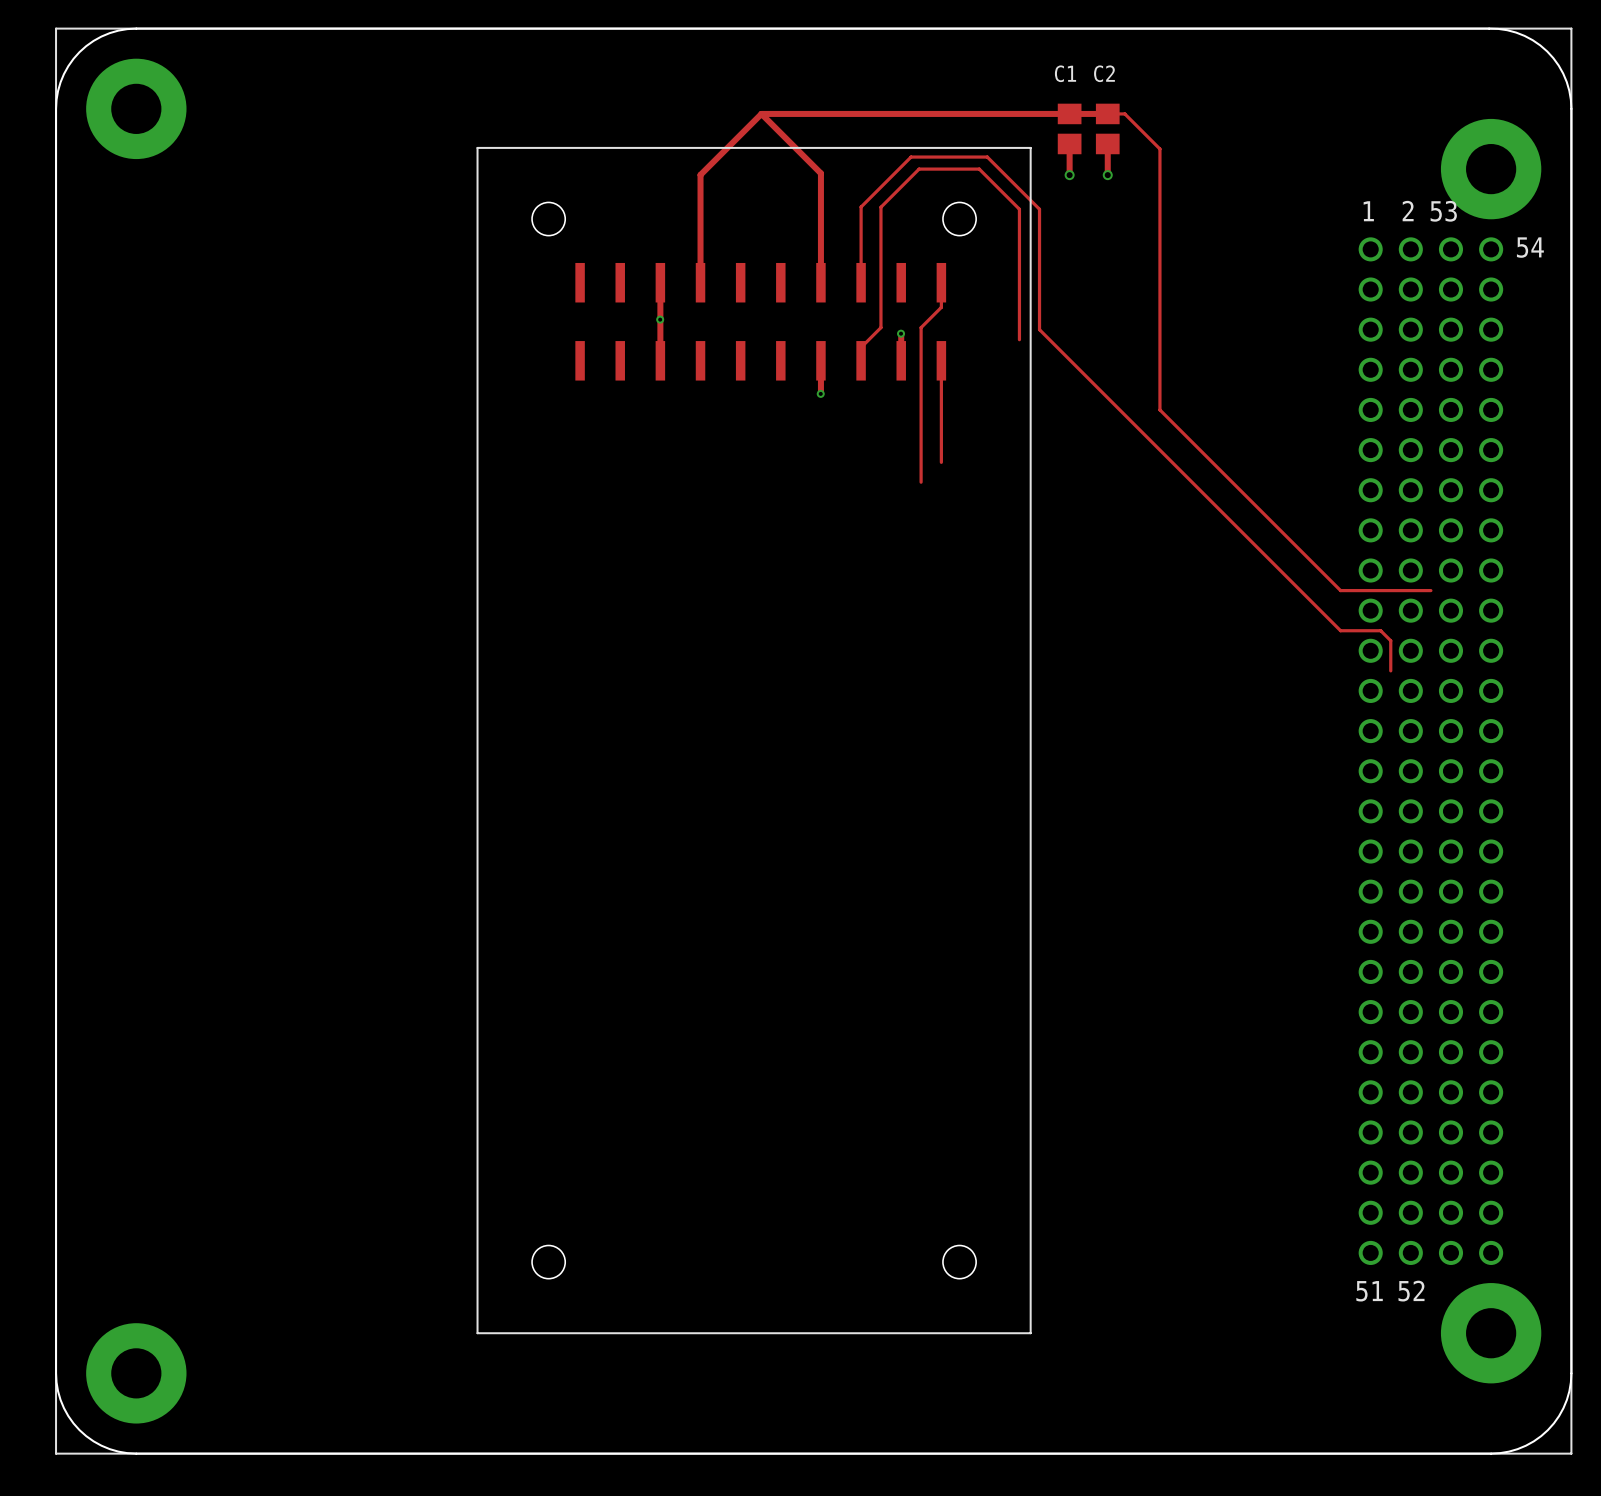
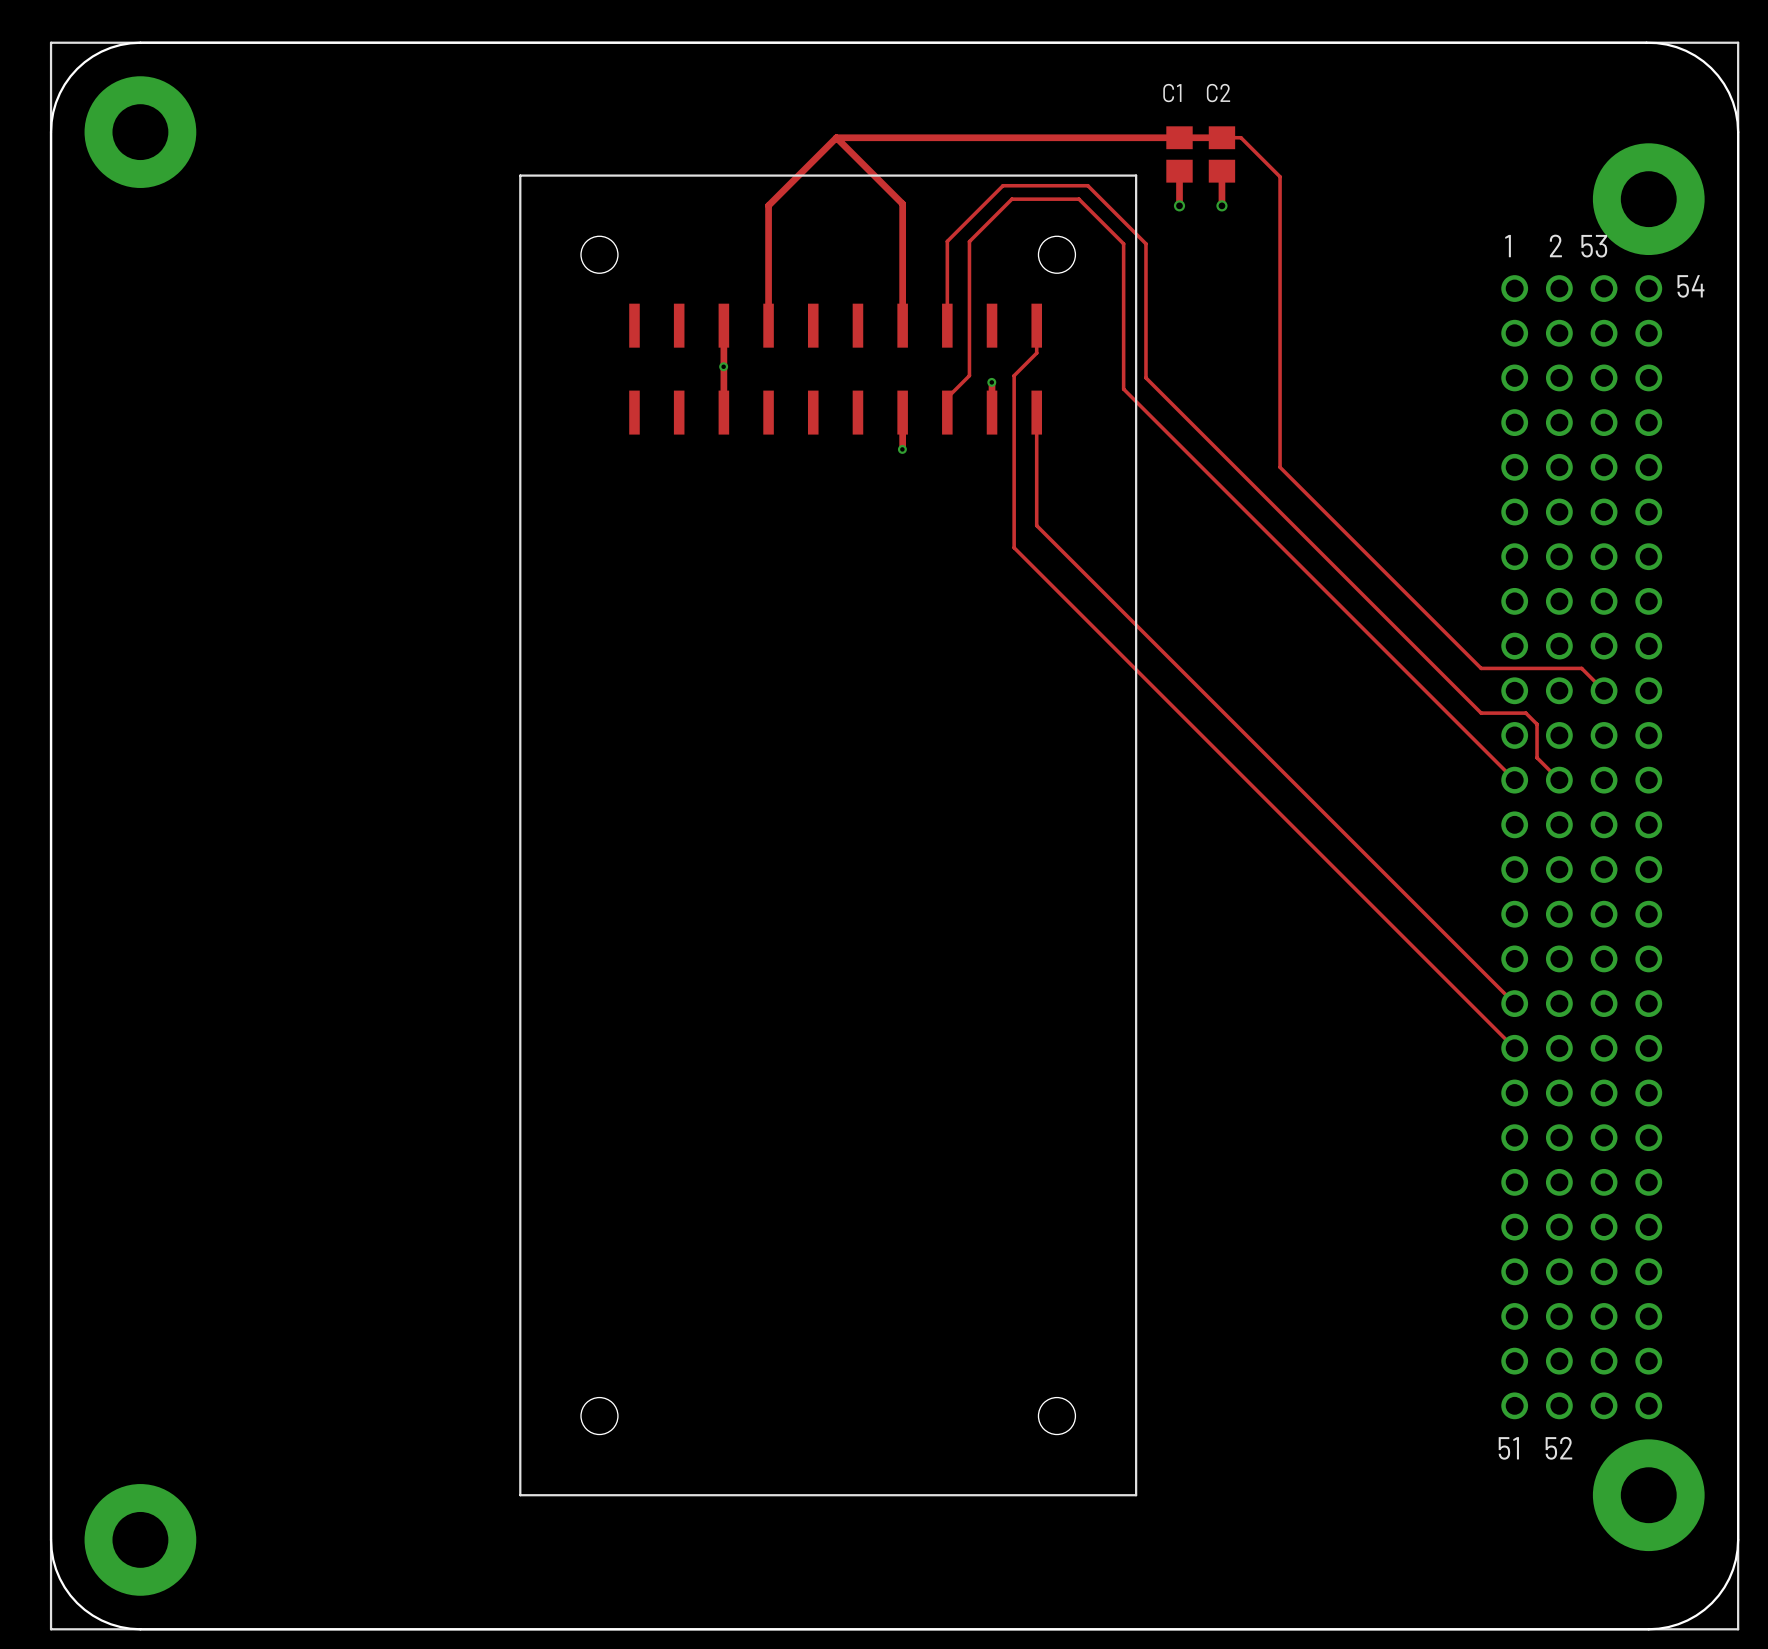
part footprint: [55, 27, 1573, 1455] -> [49, 41, 1740, 1631]
track: none -> (1123, 389) (1514, 780)
track: none -> (1036, 525) (1514, 1003)
track: none -> (1014, 547) (1514, 1048)
track: none -> (1581, 668) (1604, 690)
track: none -> (1537, 757) (1559, 780)

